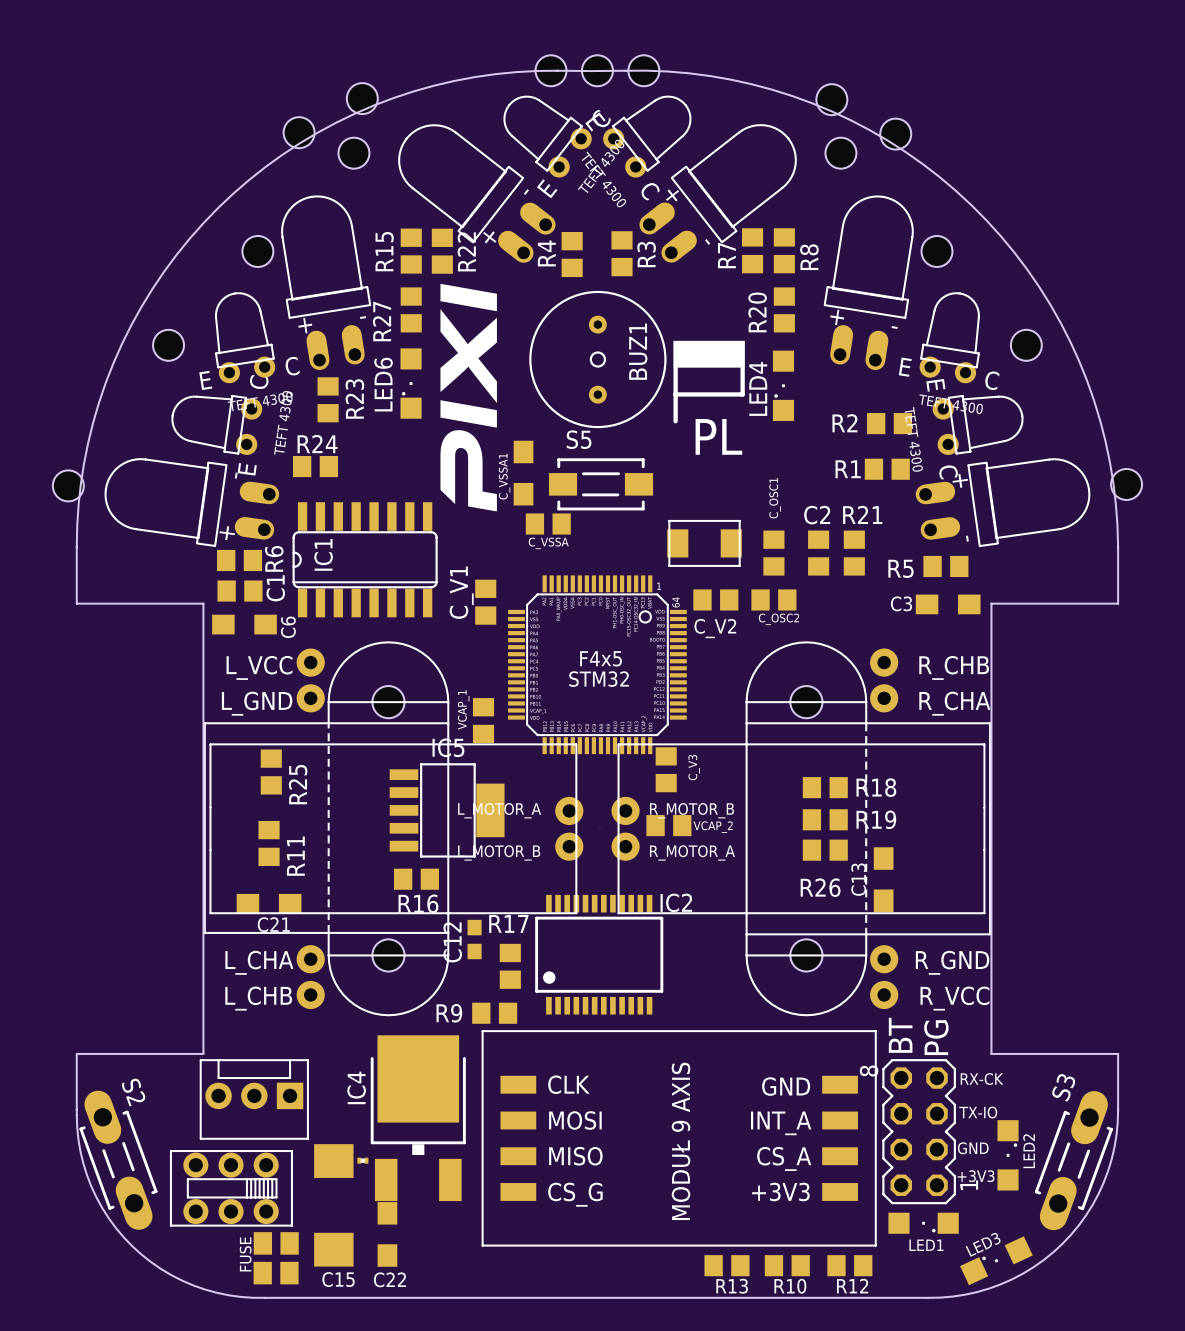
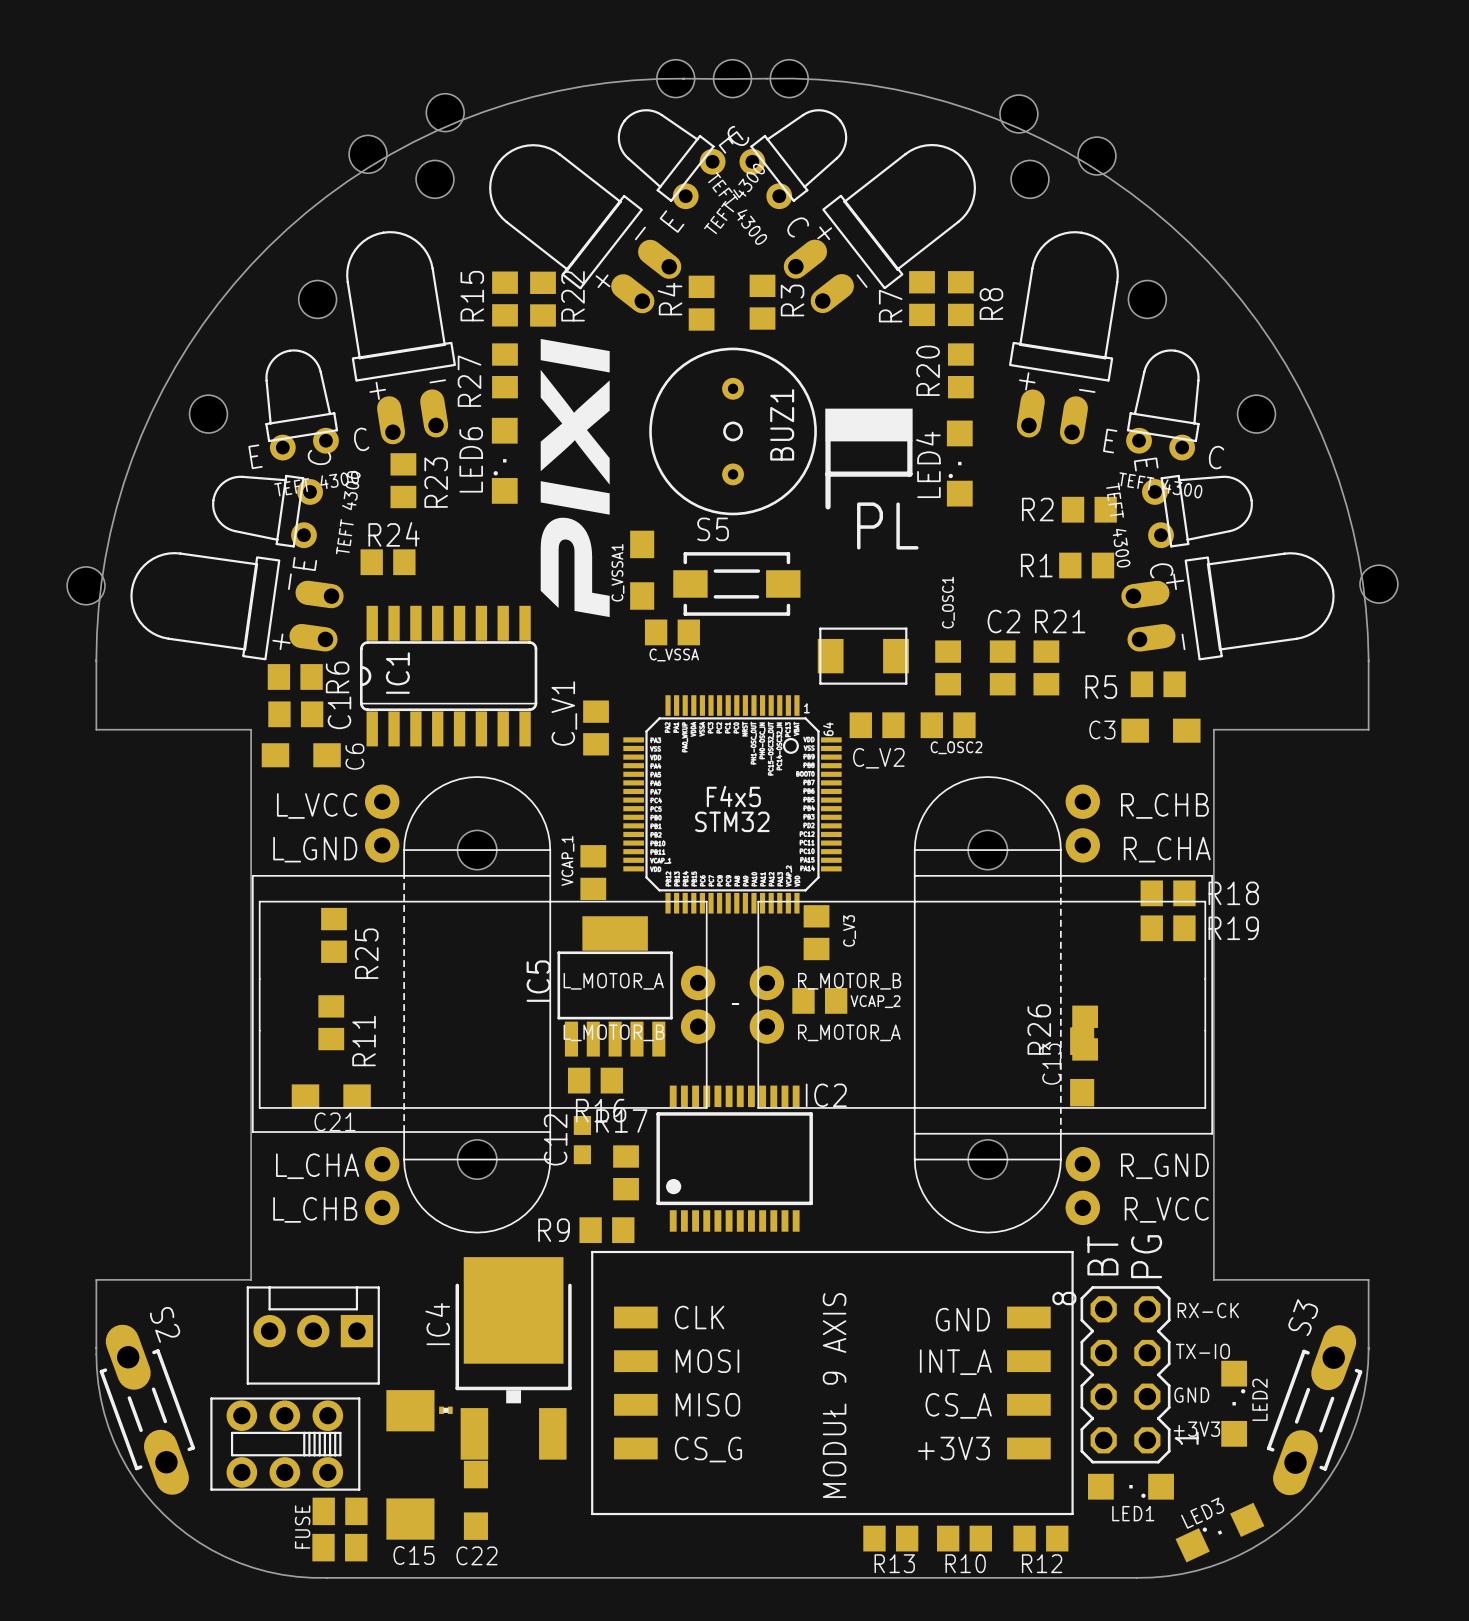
R18 position: (825, 787) -> (1168, 893)
IC5 rotation: 0° (447, 810) -> 90° counterclockwise (615, 986)
R19 position: (825, 819) -> (1168, 928)
R26 rotation: 0° (825, 850) -> 90° clockwise (1085, 1033)
R26 position: (825, 850) -> (1085, 1033)
R16 position: (416, 879) -> (595, 1080)

